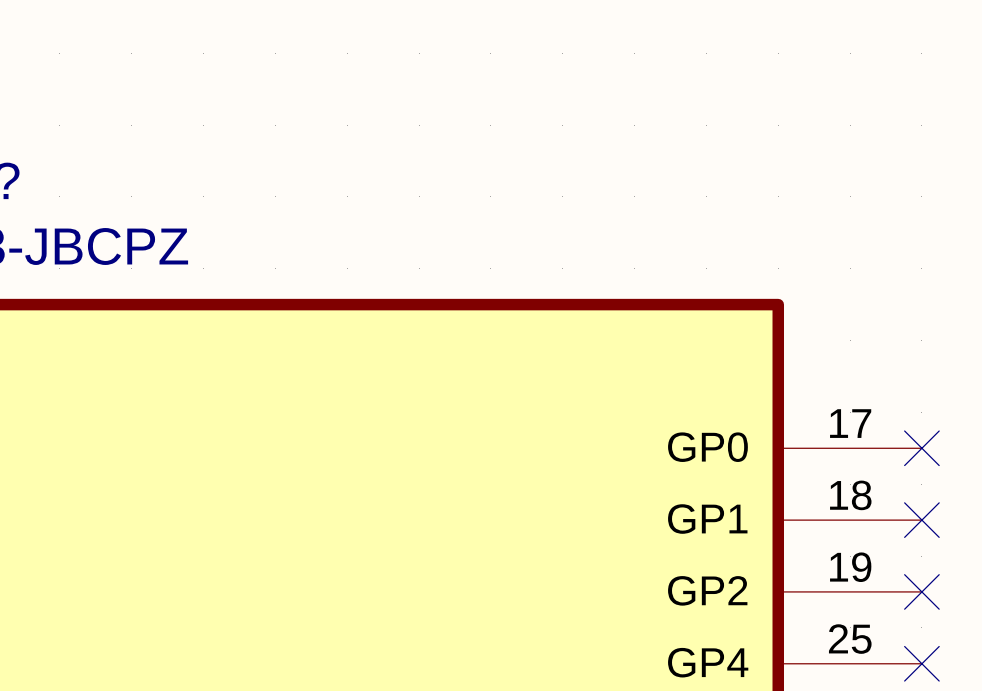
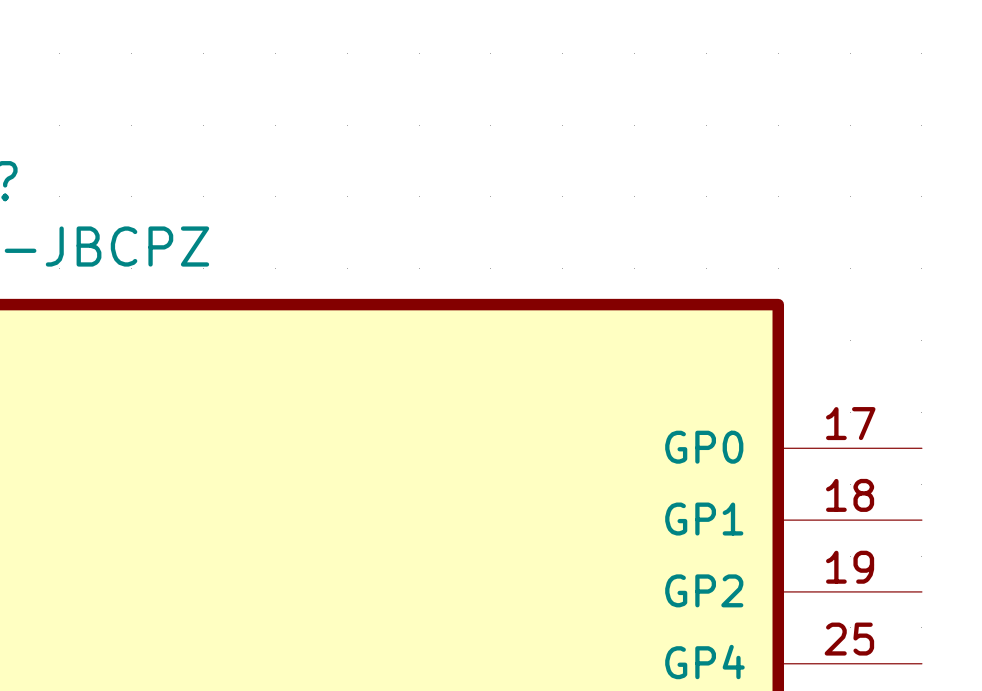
no-connect mark: (921, 448) -> none
no-connect mark: (921, 520) -> none
no-connect mark: (921, 591) -> none
no-connect mark: (921, 663) -> none

